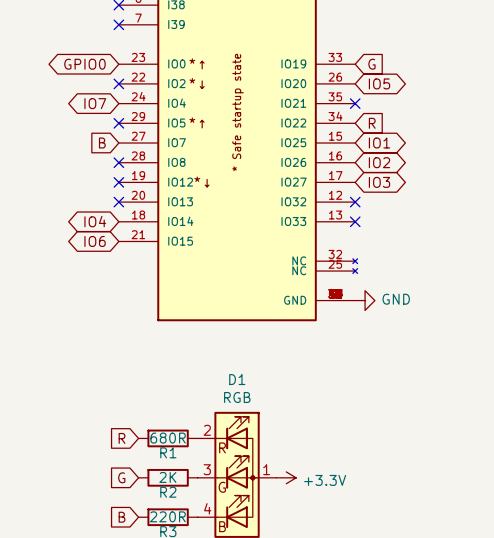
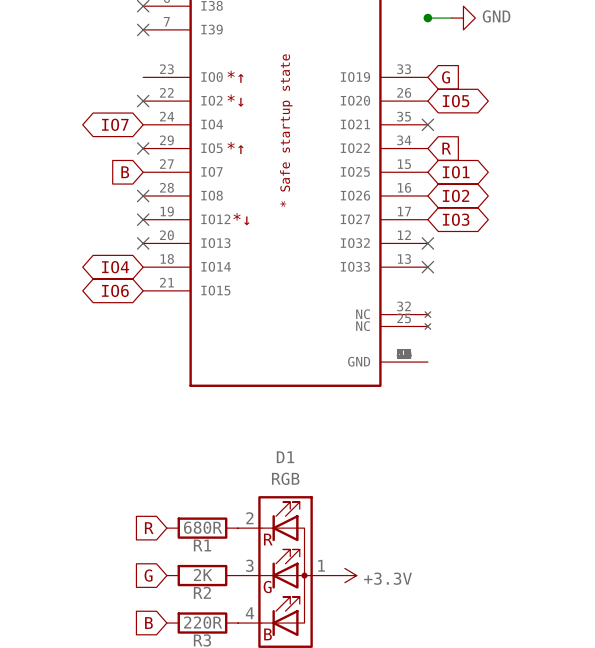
wire: none -> (427, 18) (451, 18)
junction: none -> (427, 18)
power symbol: none -> GND (463, 18)
global label: GPIO0 (84, 64) -> none
power symbol: GND (365, 300) -> none

